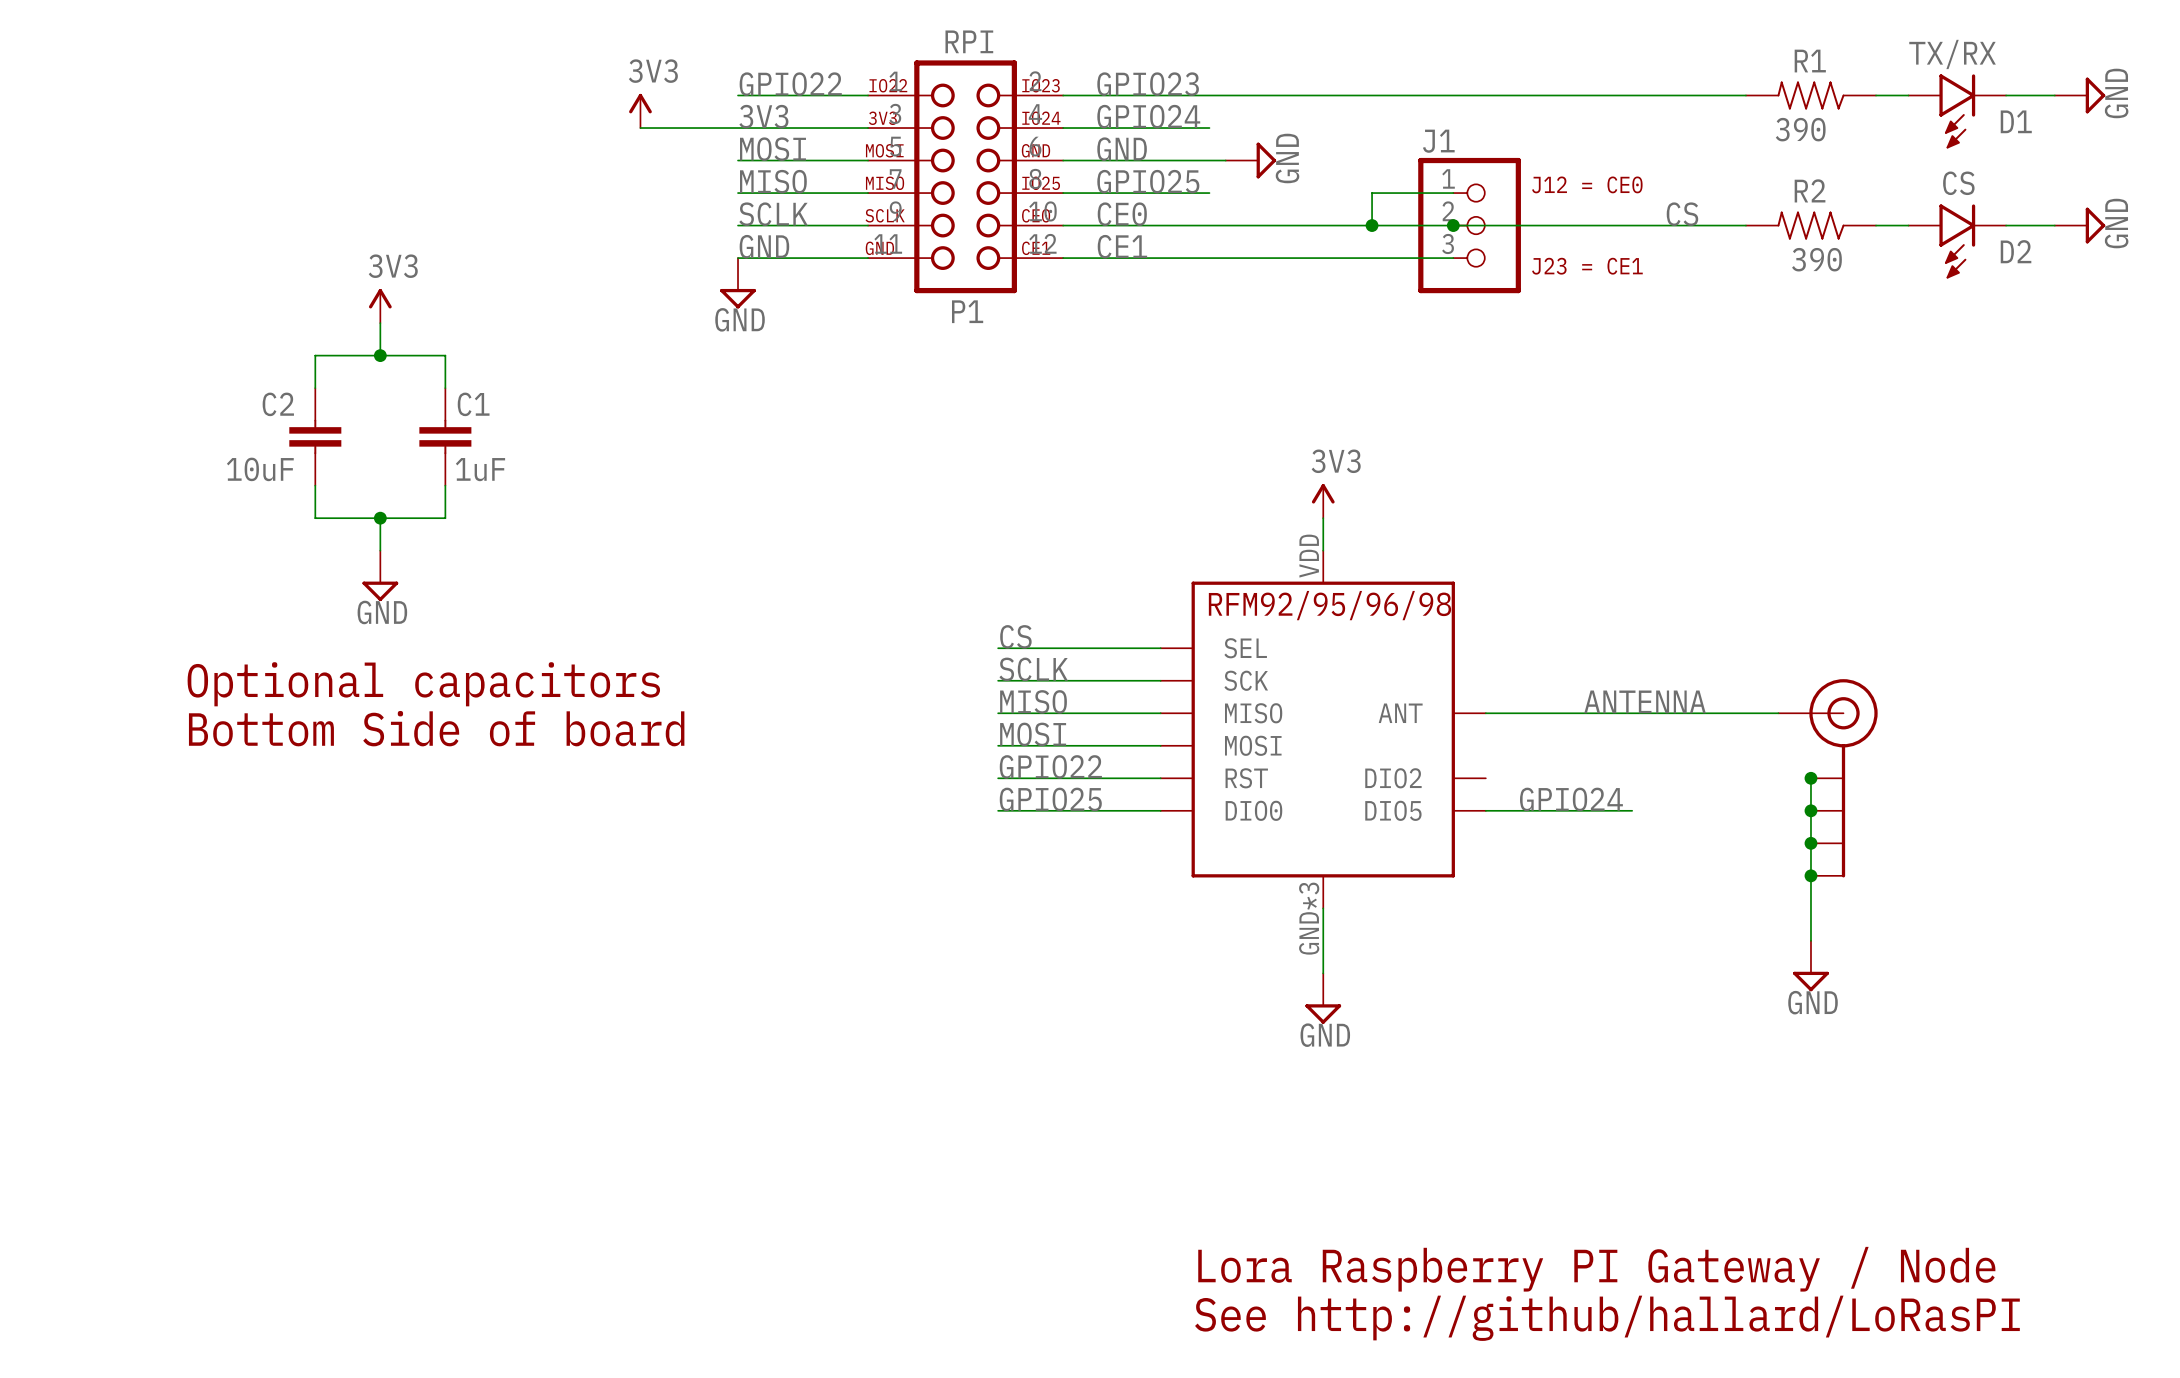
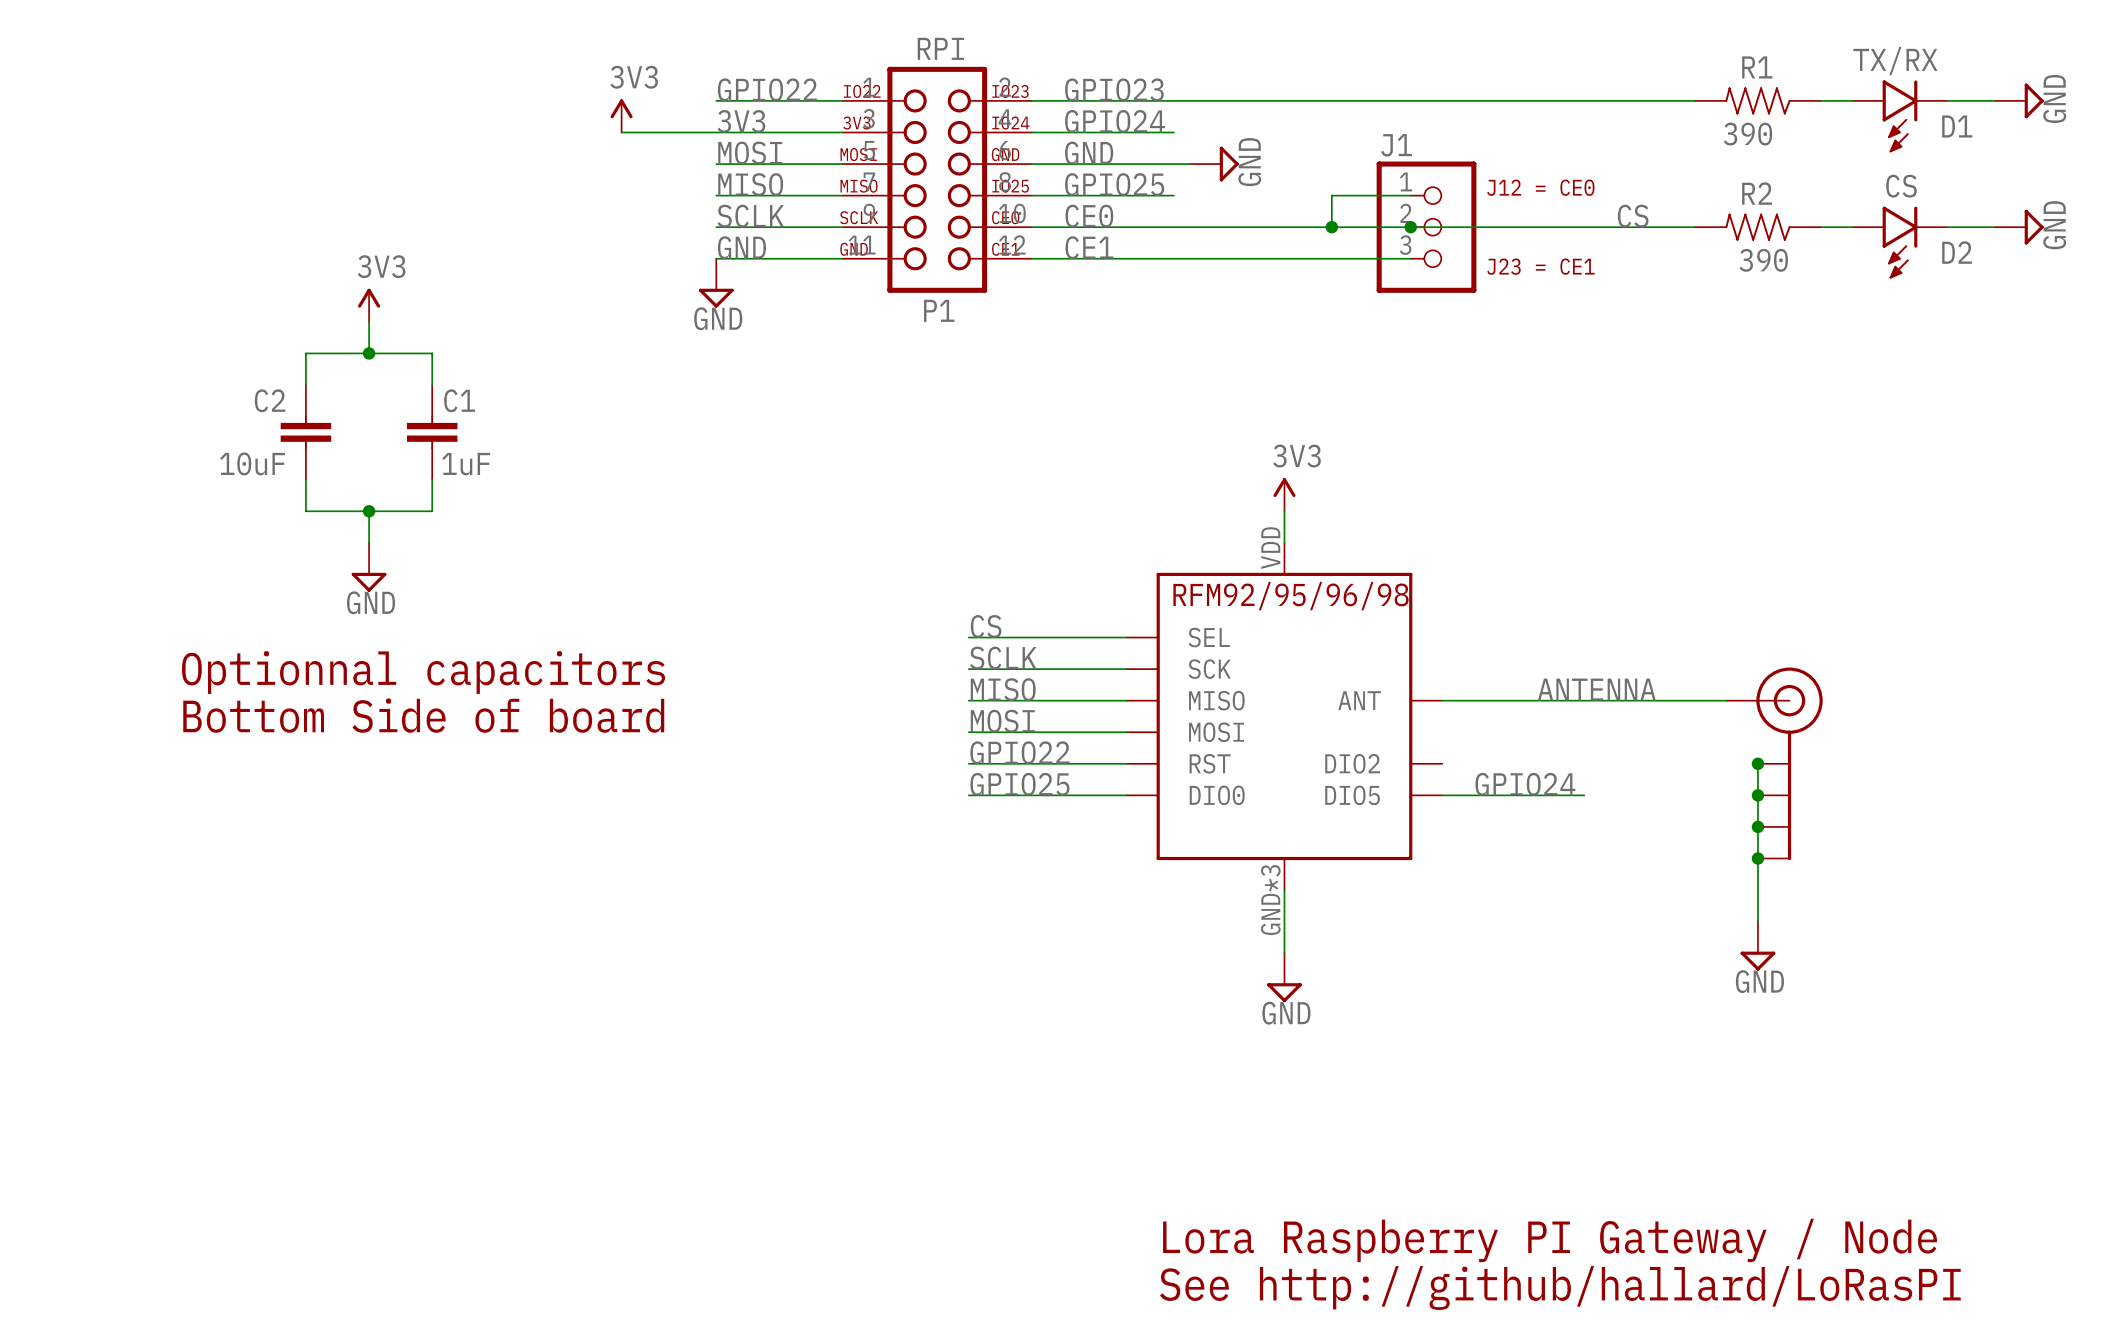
text: Optional capacitors (423, 684) -> Optionnal capacitors (423, 672)

